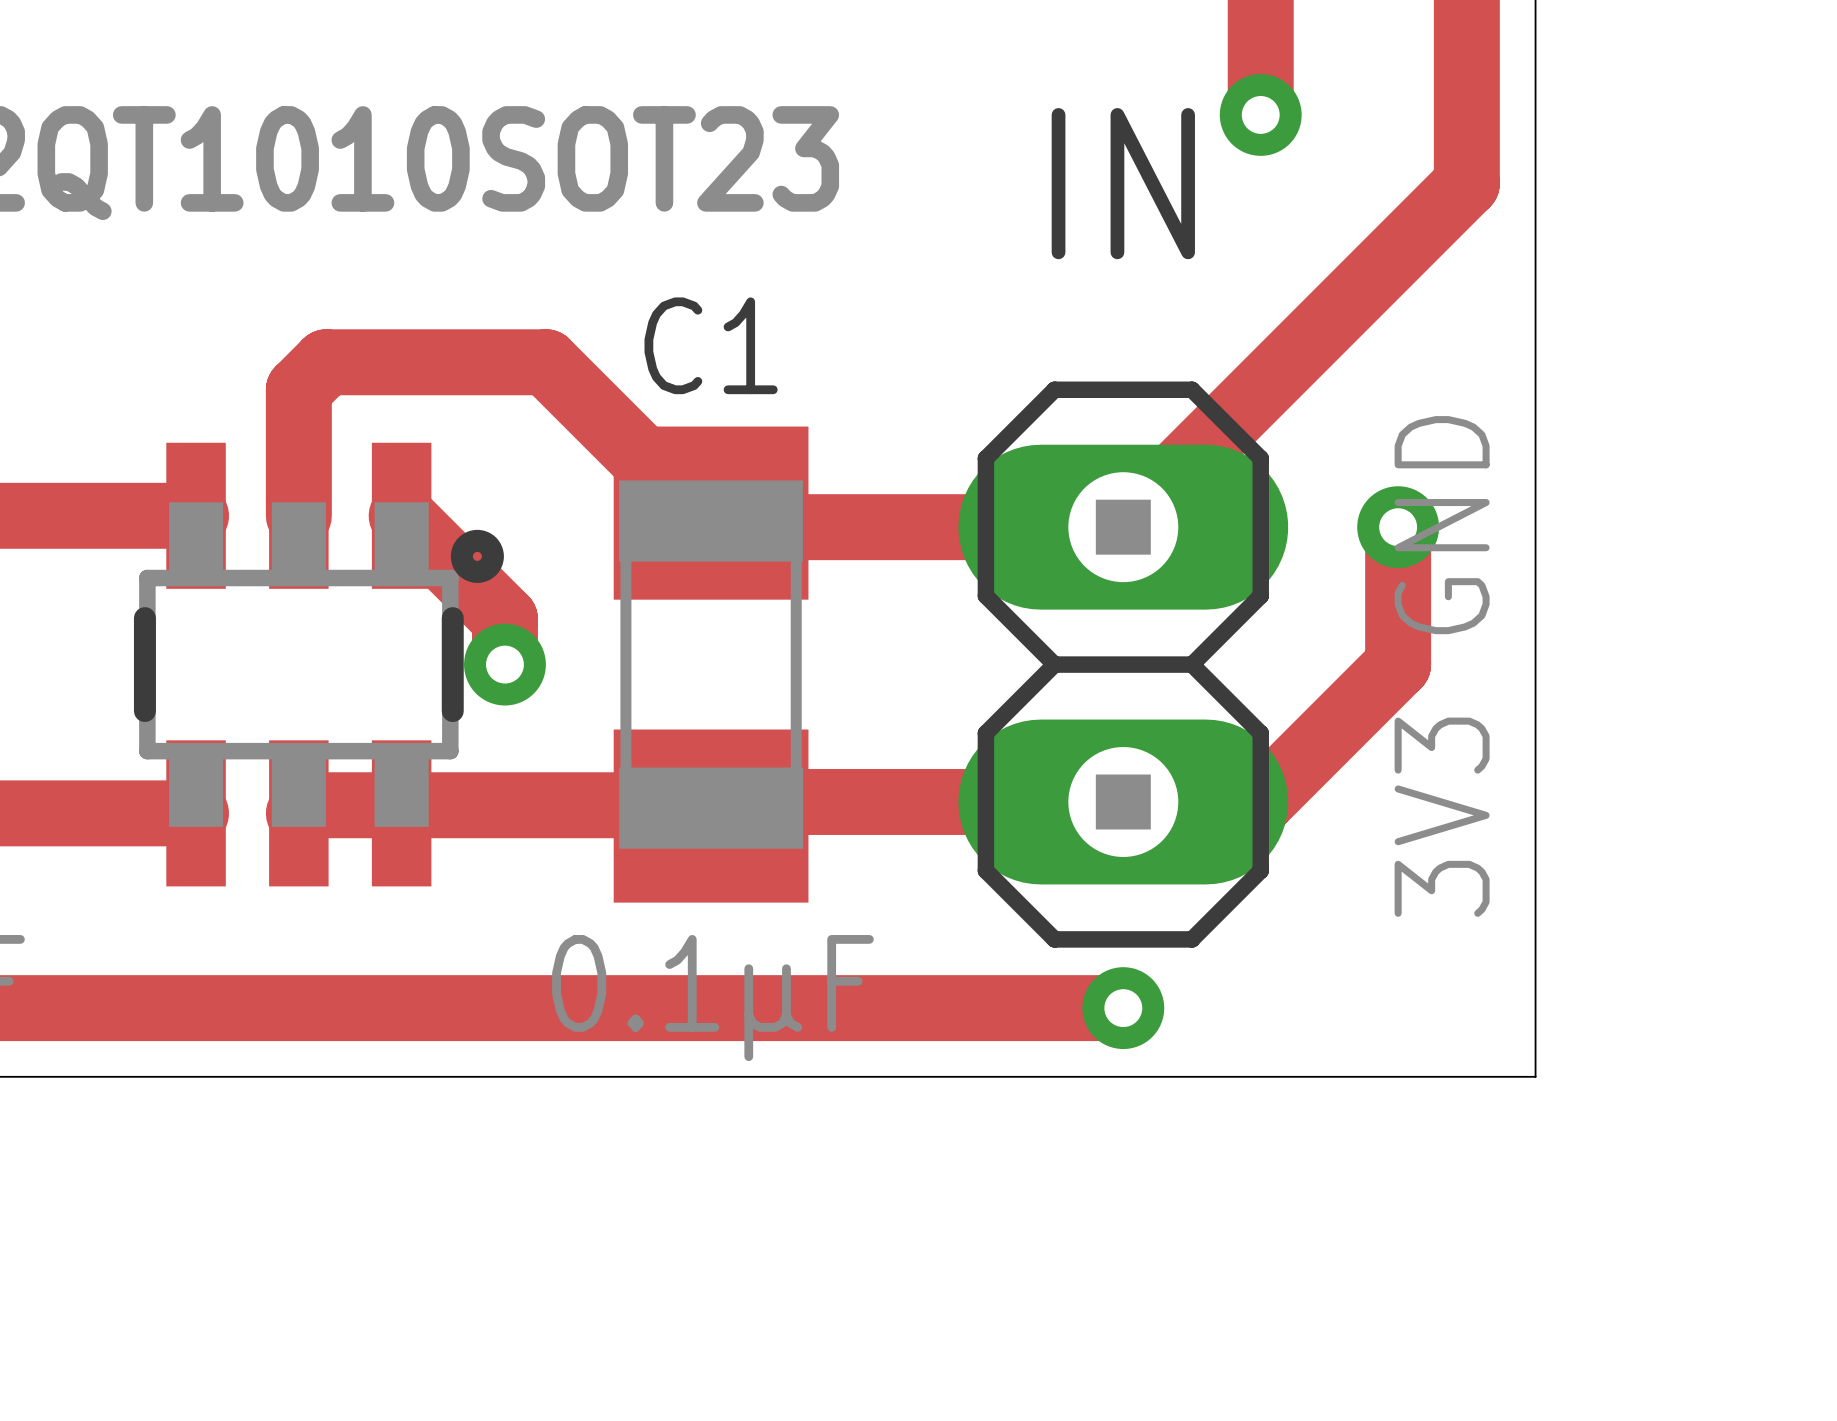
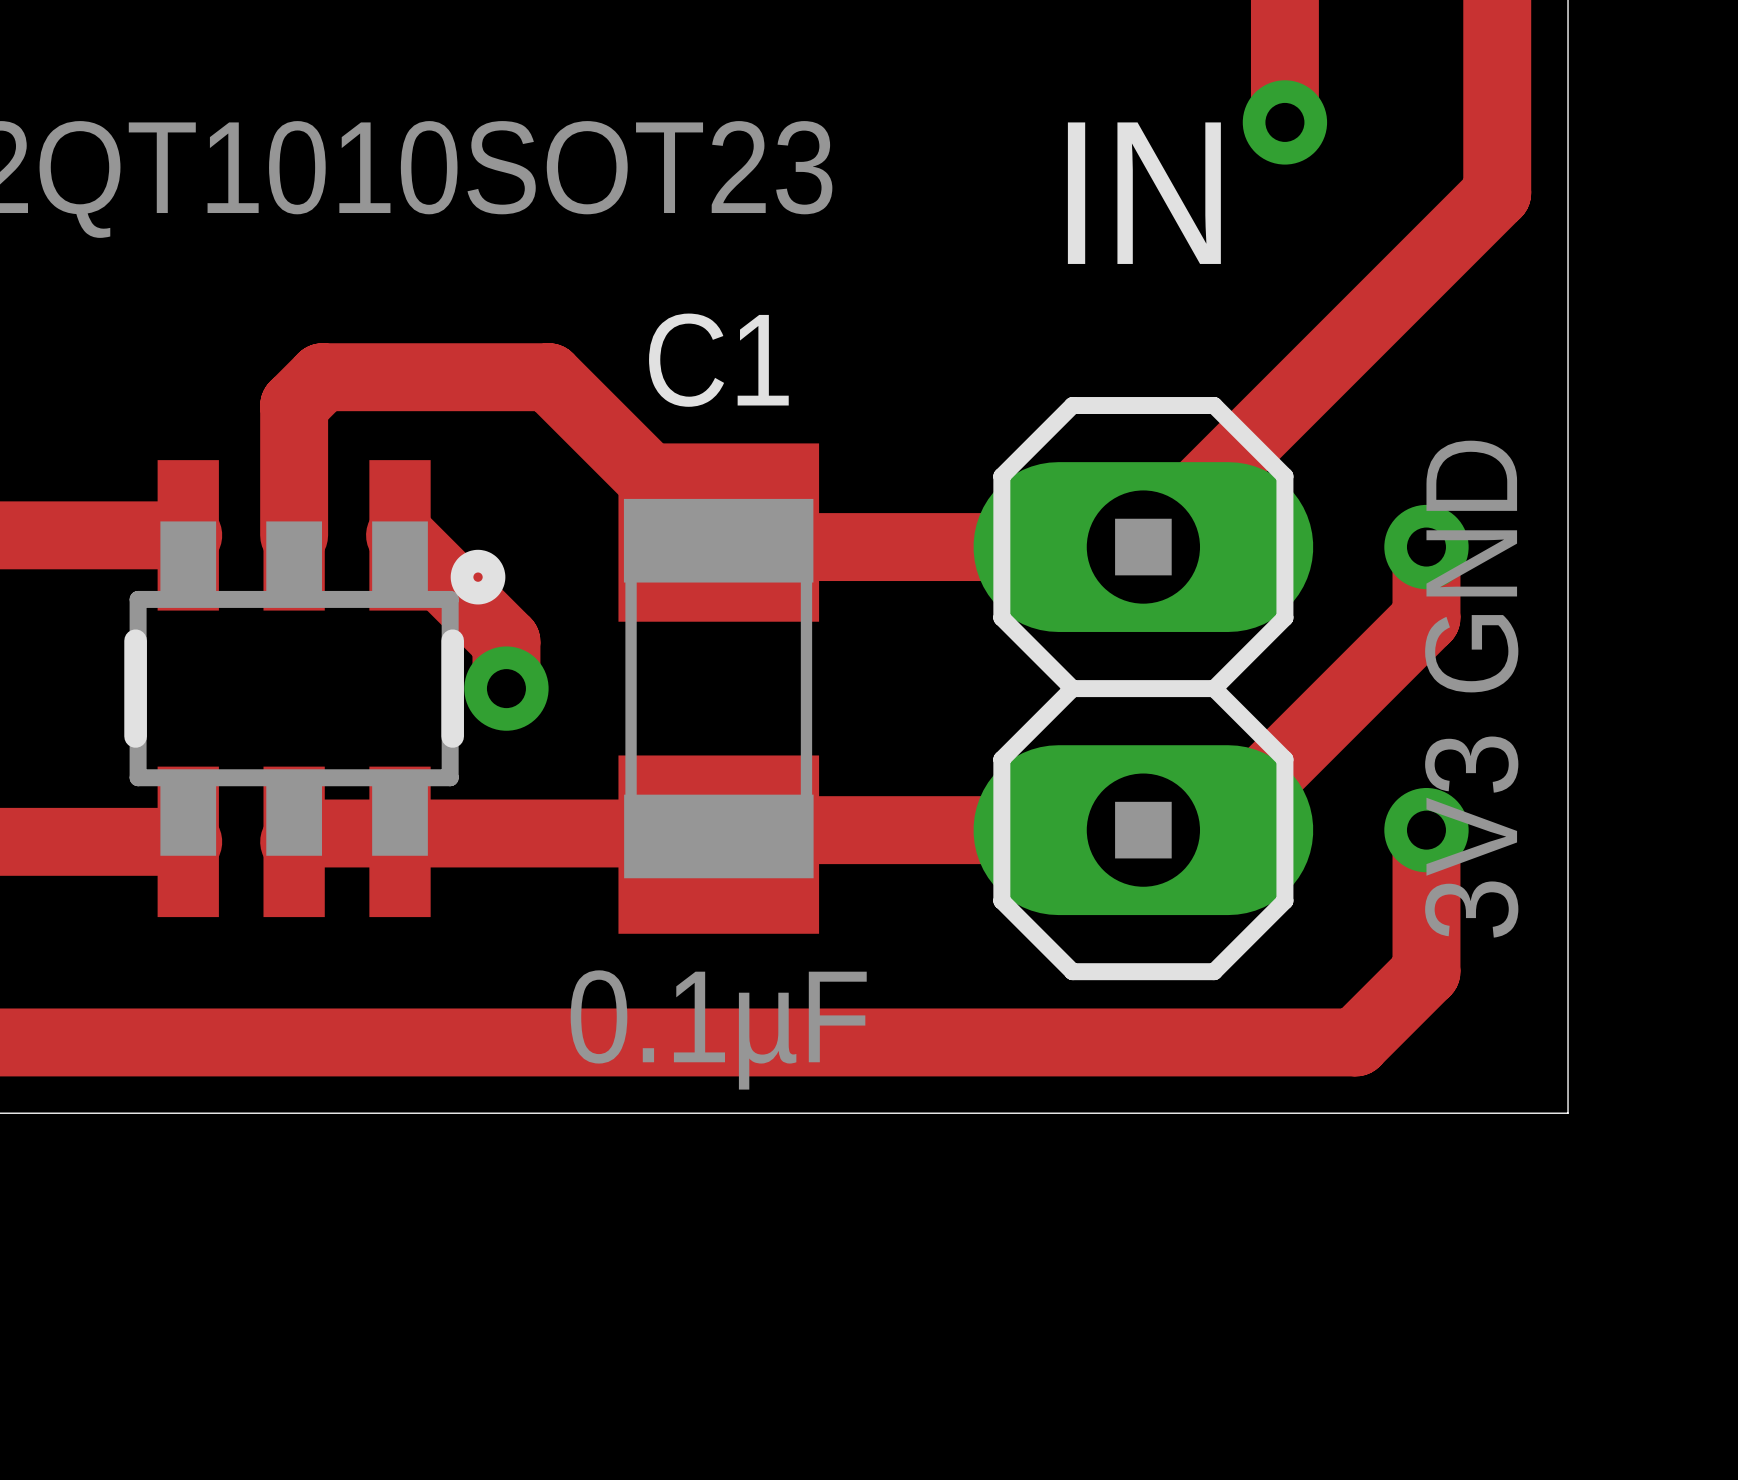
track: (1398, 595) (1398, 664) (1260, 801) (1192, 801) -> (1426, 617) (1214, 830)
track: none -> (1426, 830) (1426, 971) (1355, 1042) (1143, 1042)
via position: (1123, 1008) -> (1426, 830)

